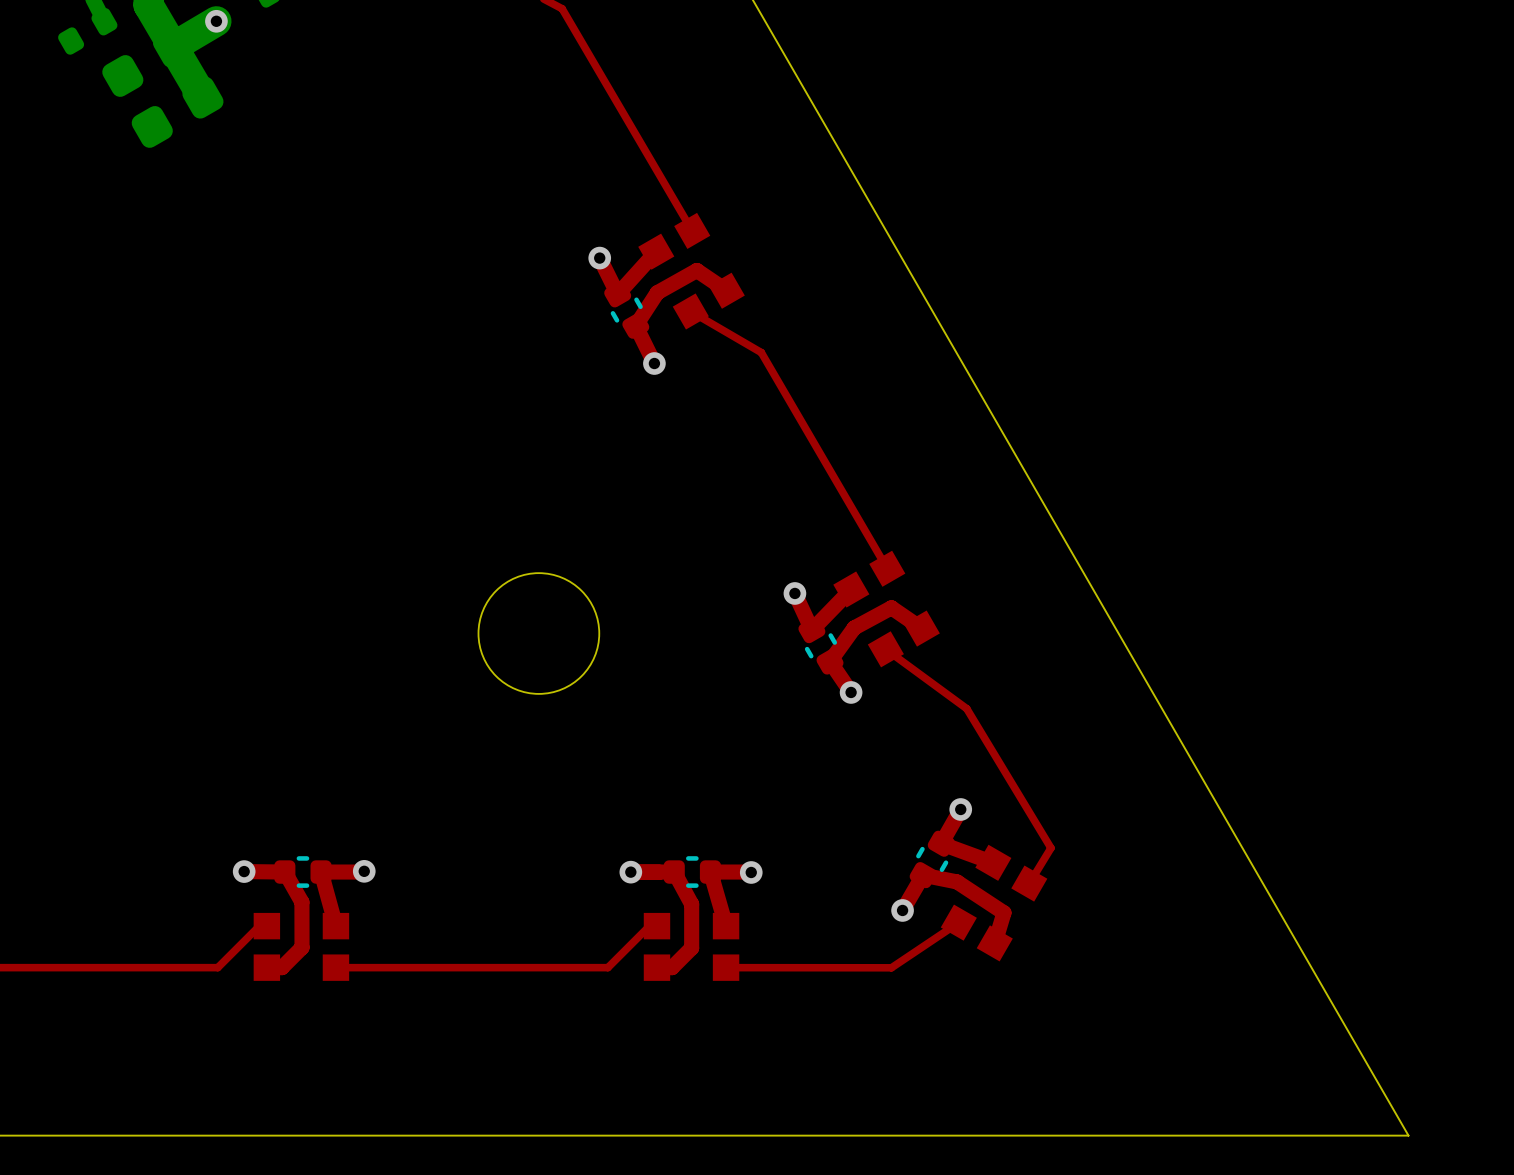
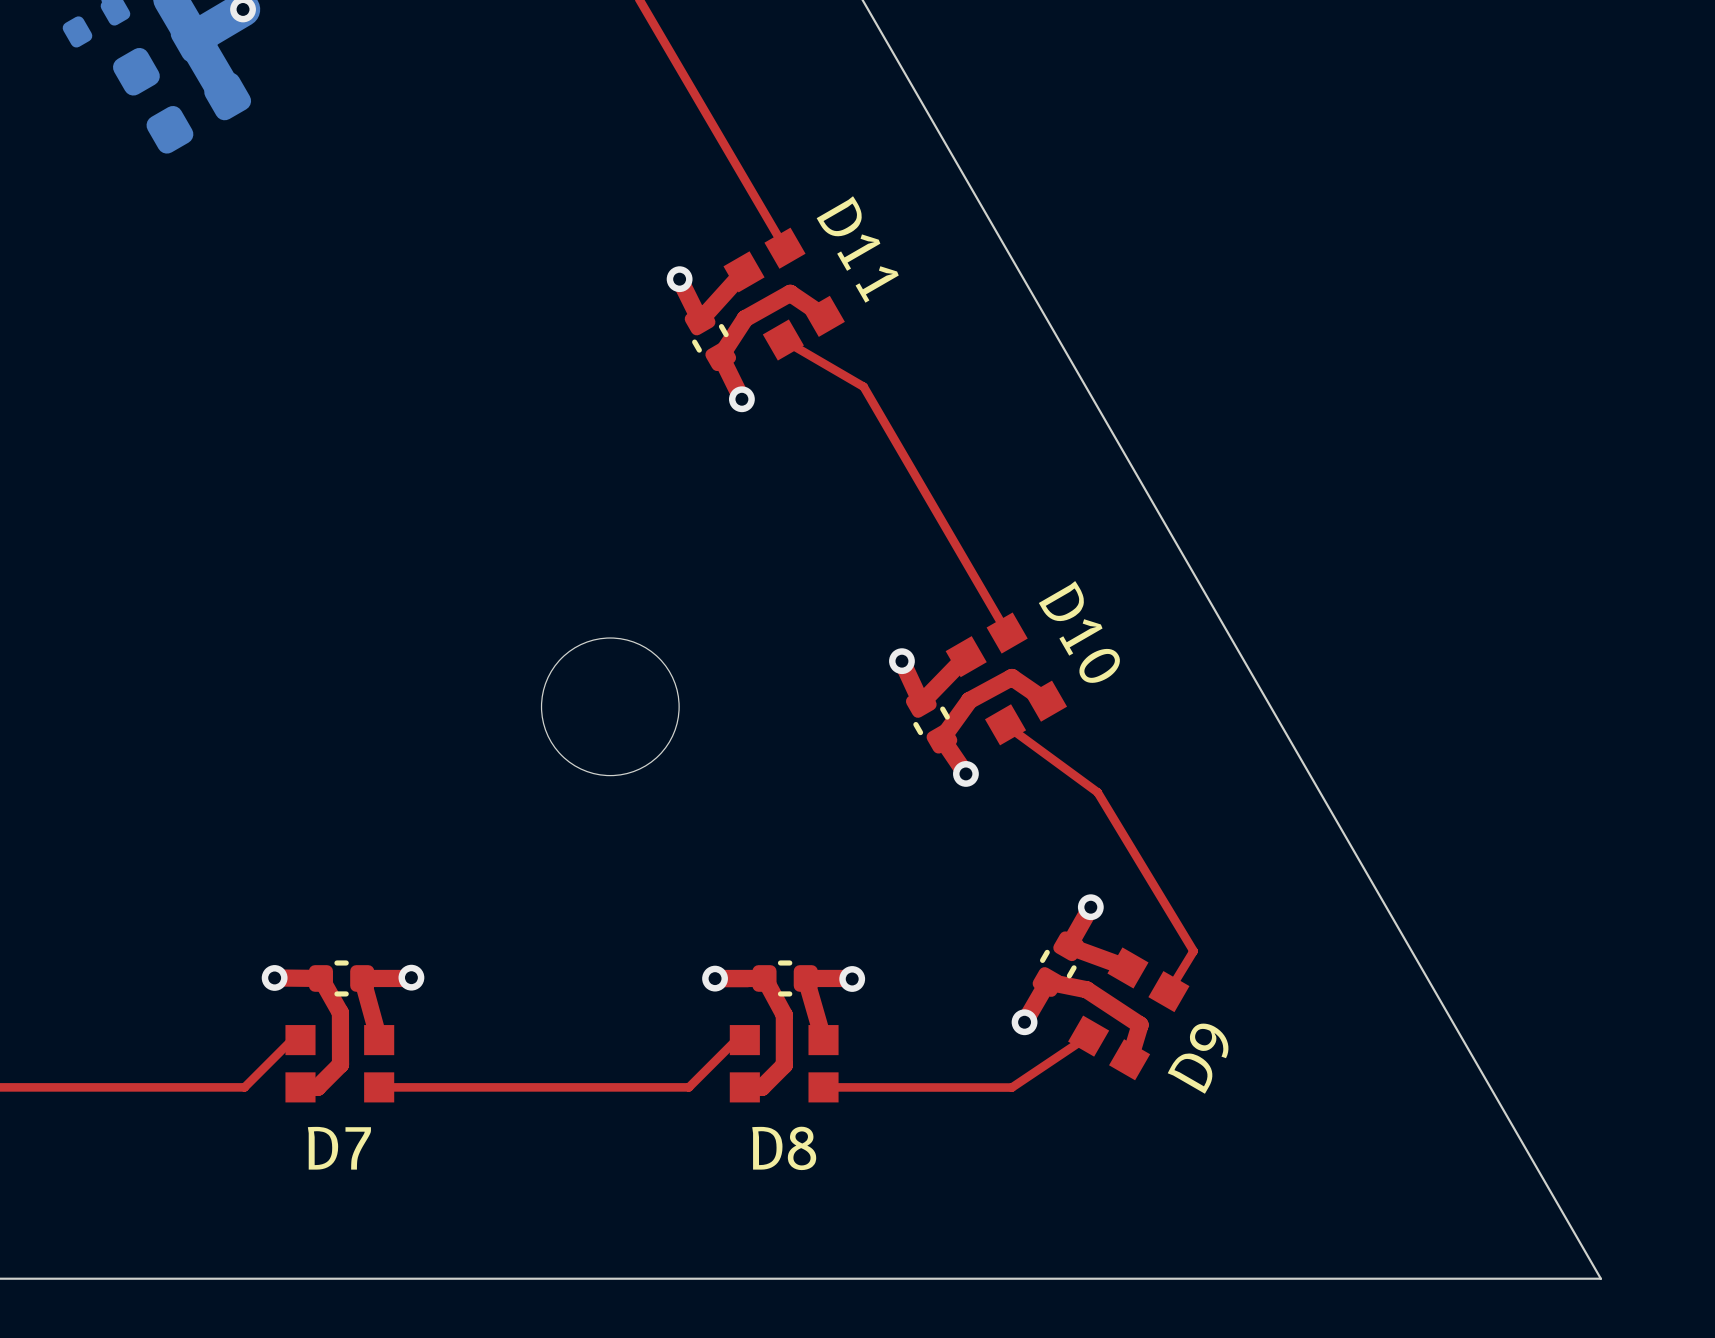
D11 name: none -> D11 (857, 249)
D10 name: none -> D10 (1079, 631)
D9 name: none -> D9 (1198, 1058)
D7 name: none -> D7 (339, 1148)
D8 name: none -> D8 (784, 1148)

